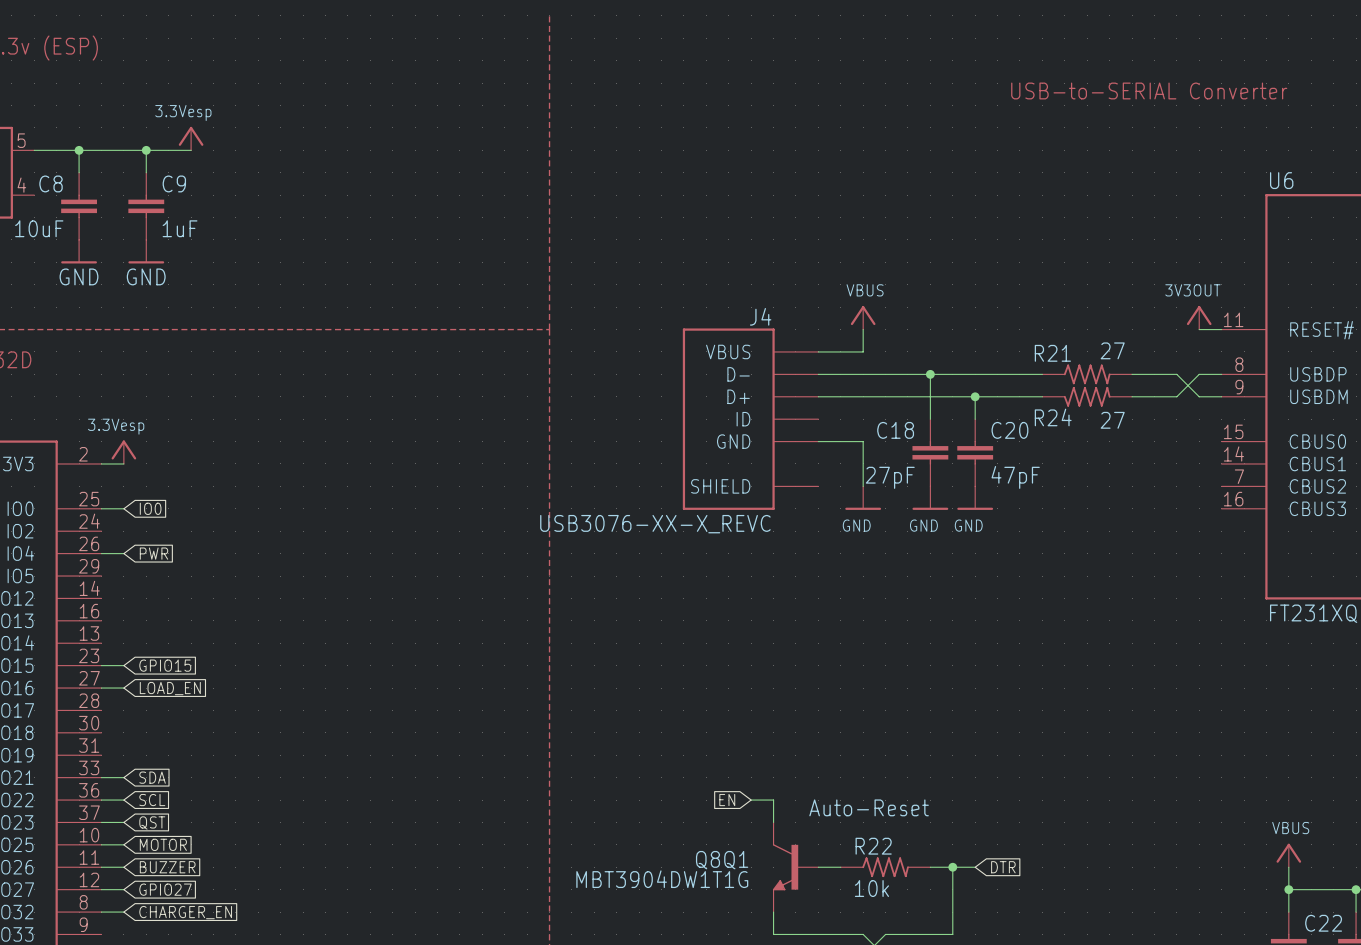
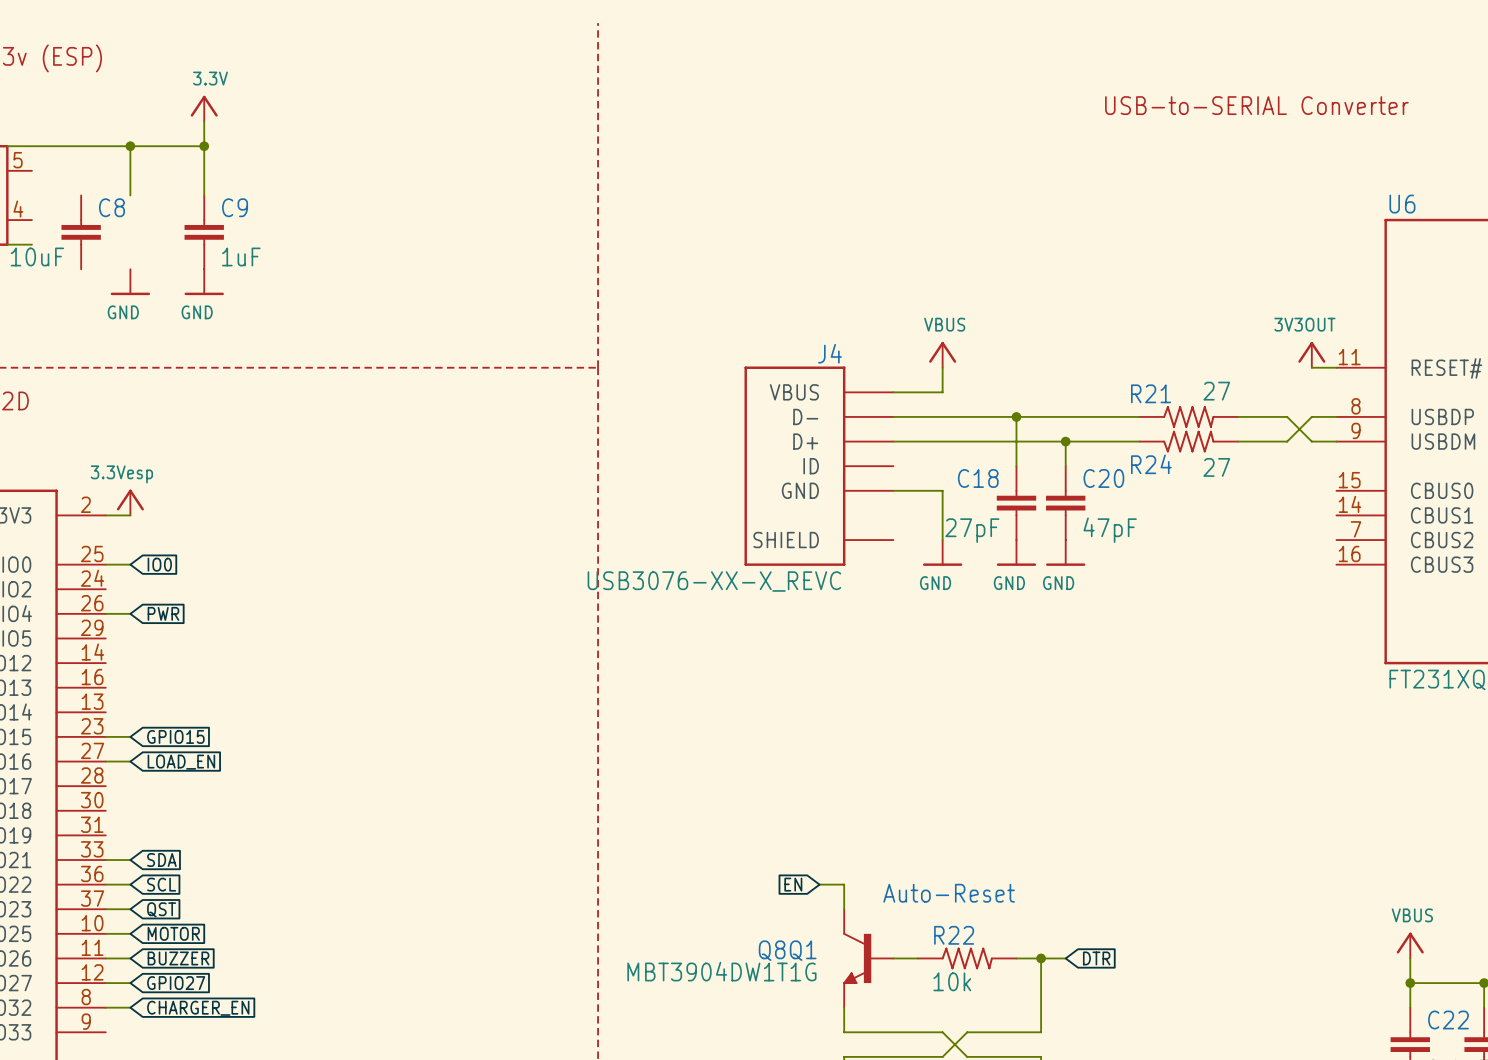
power symbol: none -> 3.3V (204, 108)
wire: none -> (204, 121) (204, 195)
wire: none -> (7, 146) (204, 146)
wire: none -> (130, 146) (130, 195)
junction: none -> (130, 146)
junction: none -> (204, 146)
power symbol: 3.3Vesp (191, 138) -> none
wire: (34, 150) (191, 150) -> none
wire: (79, 150) (79, 172) -> none
junction: (79, 150) -> none
wire: (146, 150) (146, 172) -> none
junction: (146, 150) -> none
C8 name position: C8 (51, 183) -> C8 (111, 207)
C9 position: (146, 206) -> (204, 232)
wire: none -> (7, 244) (31, 244)
power symbol: GND (79, 251) -> none
power symbol: none -> GND (130, 282)
power symbol: GND (146, 251) -> none
power symbol: none -> GND (204, 282)

